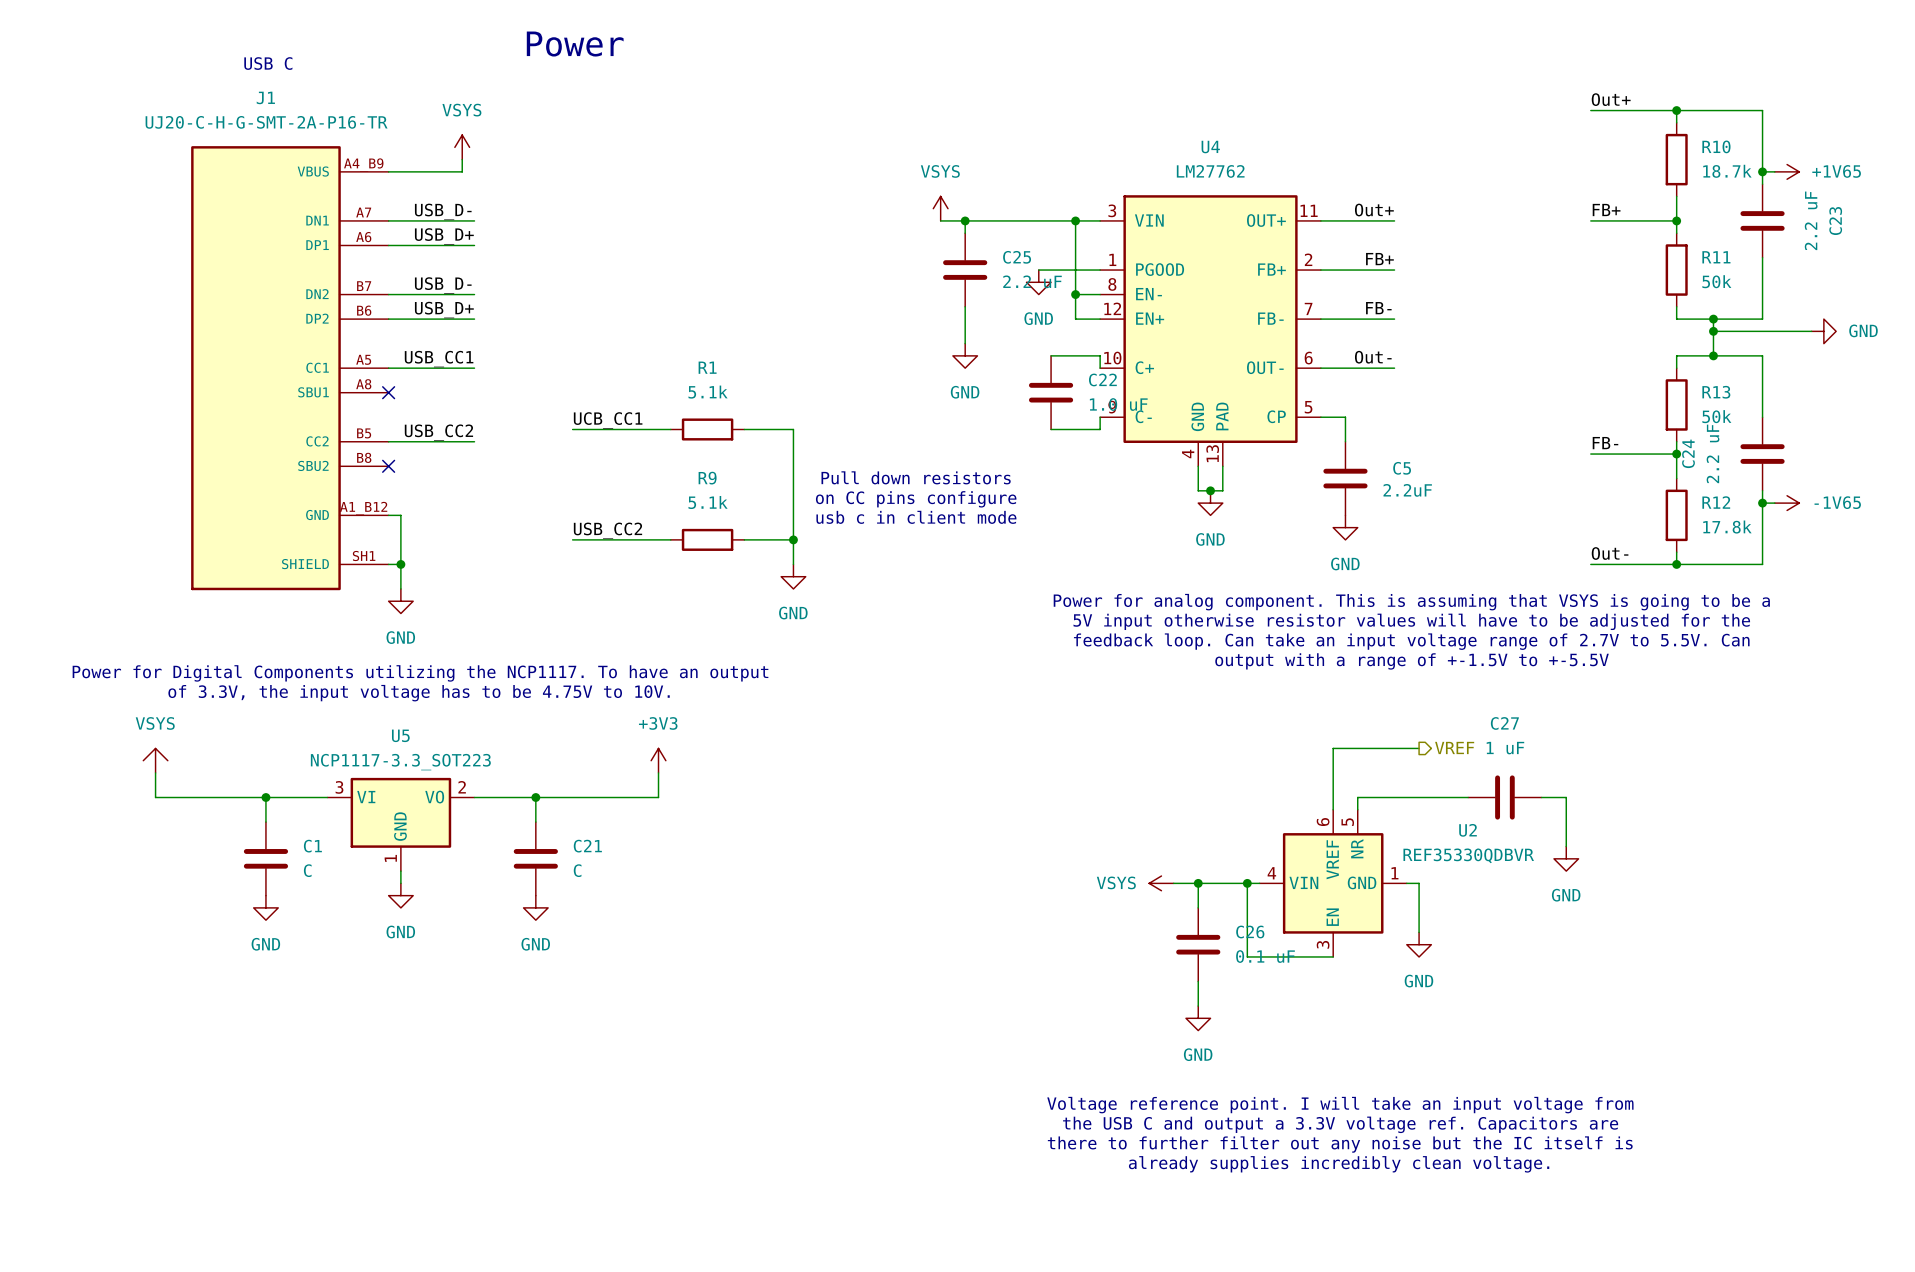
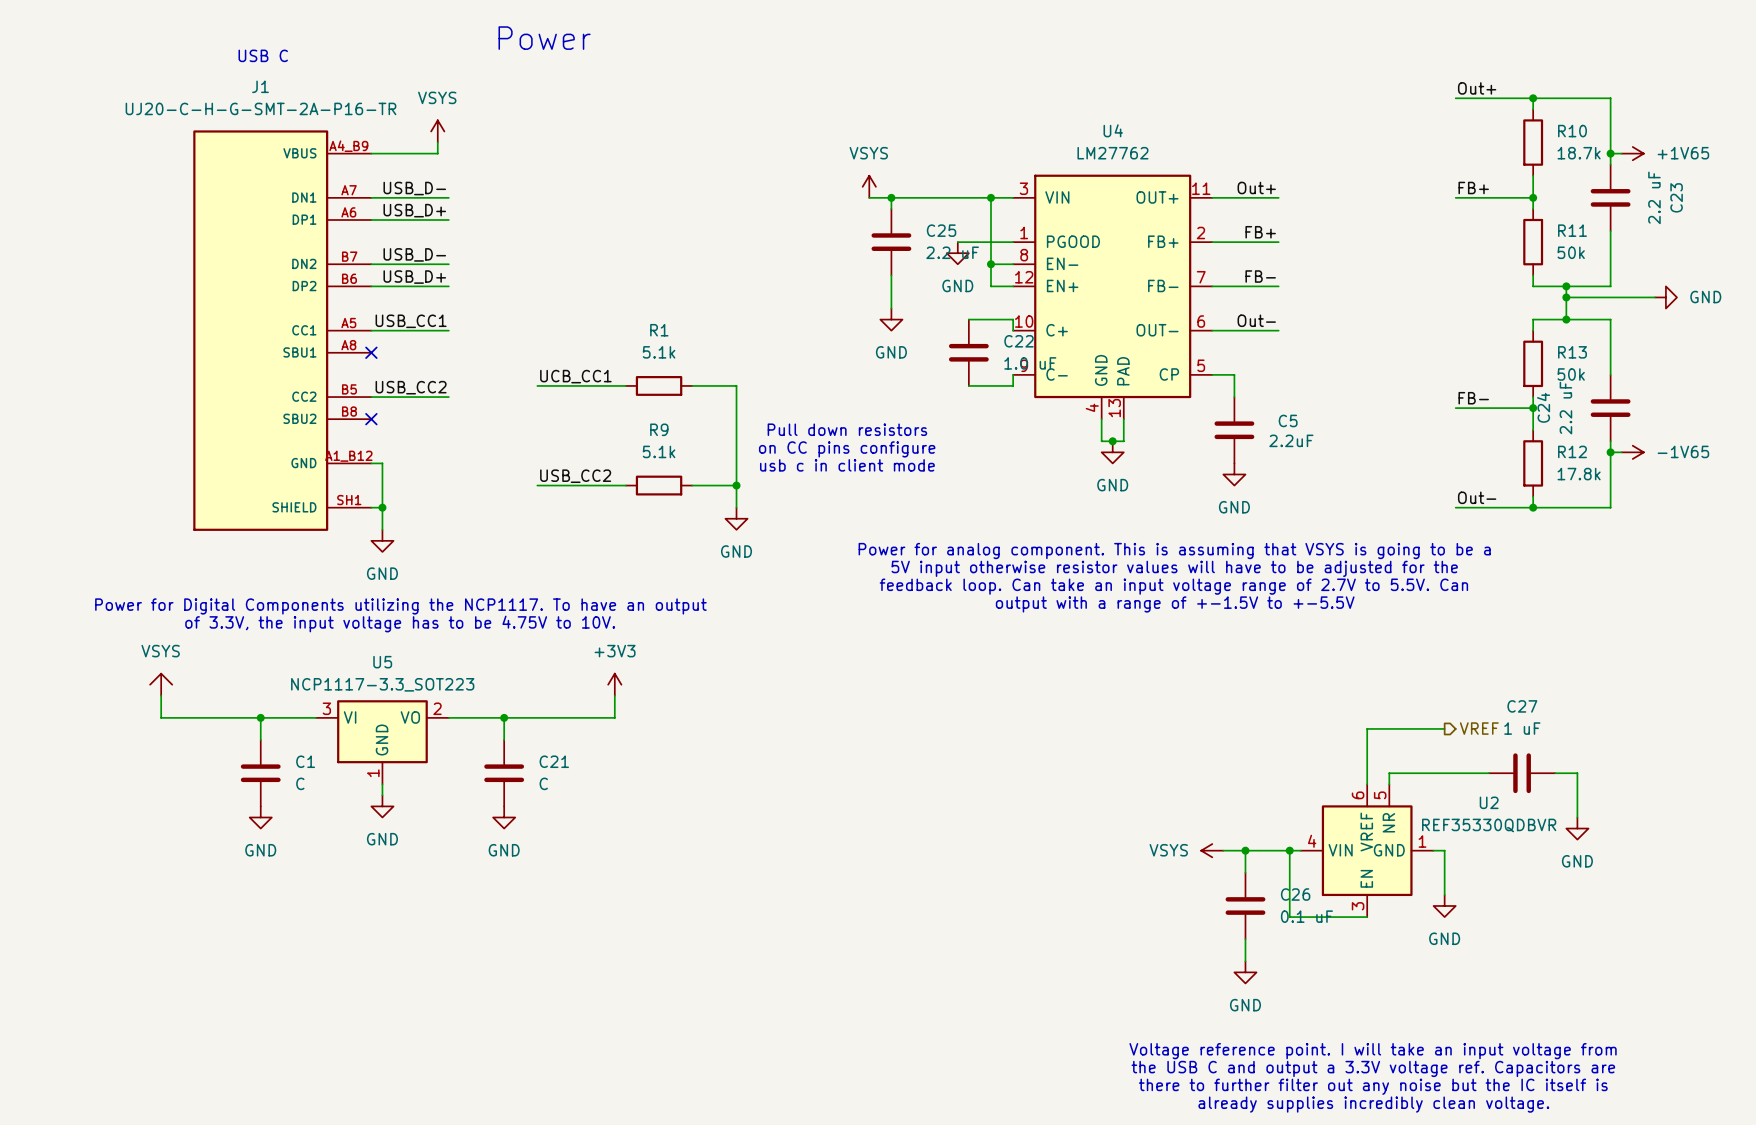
text position: Power for analog component. This is assuming that VSYS is going to be a (1411, 602) -> Power for analog component. This is assuming that VSYS is going to be a (1174, 551)
text position: 5V input otherwise resistor values will have to be adjusted for the (1411, 621) -> 5V input otherwise resistor values will have to be adjusted for the (1174, 568)
text position: feedback loop. Can take an input voltage range of 2.7V to 5.5V. Can (1411, 641) -> feedback loop. Can take an input voltage range of 2.7V to 5.5V. Can (1173, 586)
text position: output with a range of +-1.5V to +-5.5V (1412, 661) -> output with a range of +-1.5V to +-5.5V (1175, 604)
hierarchical label position: VREF (1454, 747) -> VREF (1479, 728)
wire: (1419, 748) (1333, 748) (1333, 809) -> (1444, 728) (1367, 728) (1367, 784)
wire: (1468, 797) (1357, 797) (1357, 809) -> (1488, 773) (1389, 773) (1389, 784)
C27 position: (1504, 797) -> (1522, 773)
wire: (1541, 797) (1566, 797) (1566, 846) -> (1555, 773) (1577, 773) (1577, 817)
power symbol: GND (1566, 858) -> none
power symbol position: VSYS (1161, 883) -> VSYS (1212, 850)
wire: (1173, 883) (1259, 883) -> (1223, 850) (1300, 850)
wire: (1198, 883) (1198, 907) -> (1245, 850) (1245, 872)
junction: (1198, 883) -> none
wire: (1247, 883) (1247, 956) (1333, 956) -> (1289, 850) (1289, 917) (1367, 917)
junction: (1247, 883) -> none
U2 position: (1333, 883) -> (1367, 850)
wire: (1406, 883) (1419, 883) (1419, 932) -> (1433, 850) (1444, 850) (1444, 894)
power symbol: none -> GND (1577, 828)
C26 position: (1198, 944) -> (1245, 905)
junction: none -> (1245, 850)
junction: none -> (1289, 850)
power symbol: GND (1419, 944) -> none
wire: (1198, 981) (1198, 1006) -> (1245, 939) (1245, 961)
power symbol: none -> GND (1444, 905)
power symbol: GND (1198, 1018) -> none
power symbol: none -> GND (1245, 972)
text position: Voltage reference point. I will take an input voltage from (1340, 1105) -> Voltage reference point. I will take an input voltage from (1373, 1051)
text position: the USB C and output a 3.3V voltage ref. Capacitors are (1340, 1124) -> the USB C and output a 3.3V voltage ref. Capacitors are (1373, 1068)
text position: there to further filter out any noise but the IC itself is (1340, 1144) -> there to further filter out any noise but the IC itself is (1373, 1086)
text position: already supplies incredibly clean voltage. (1339, 1164) -> already supplies incredibly clean voltage. (1373, 1104)

